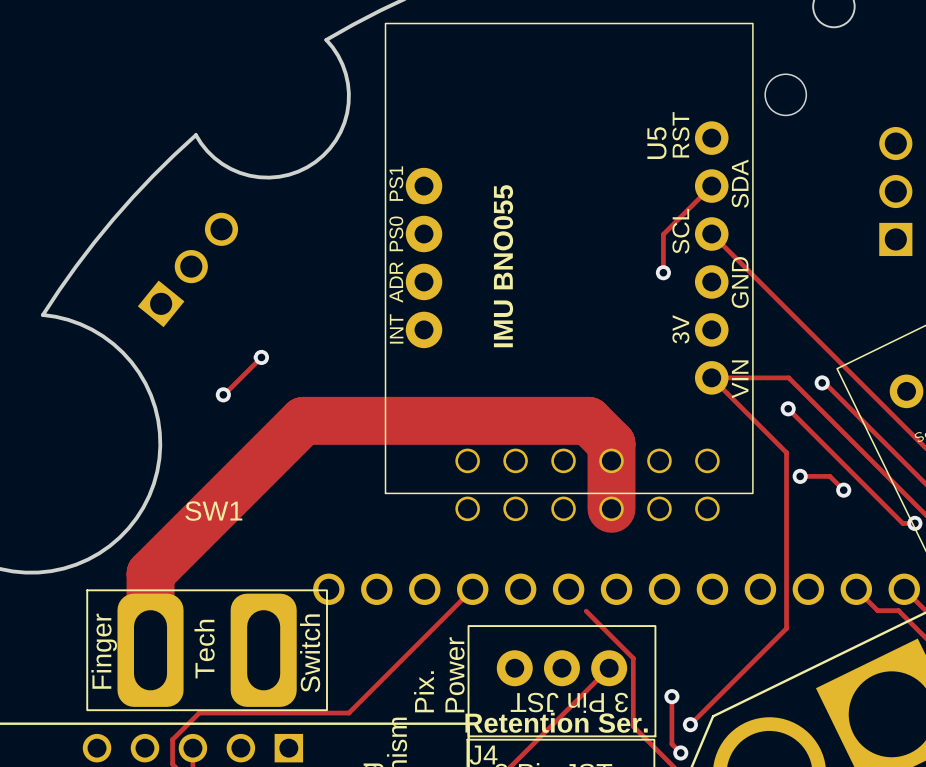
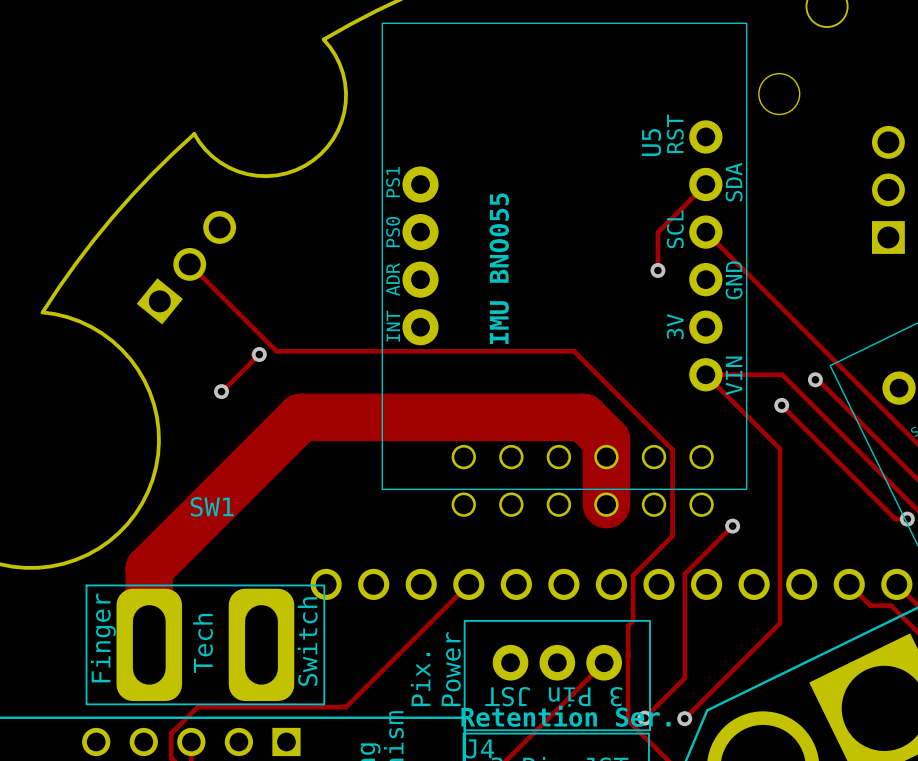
track: none -> (189, 264) (276, 351) (574, 351) (672, 449) (672, 536) (633, 575) (633, 620) (628, 625) (628, 656)
track: (800, 476) (829, 476) (843, 490) -> none
via: (800, 476) -> none
via: (843, 490) -> none
track: none -> (732, 526) (684, 573) (684, 678) (644, 718)
via: none -> (732, 526)
track: (586, 611) (633, 658) -> none
track: (671, 696) (671, 744) (680, 752) -> none
via: (671, 696) -> none
via: none -> (644, 718)
via: (680, 752) -> none

